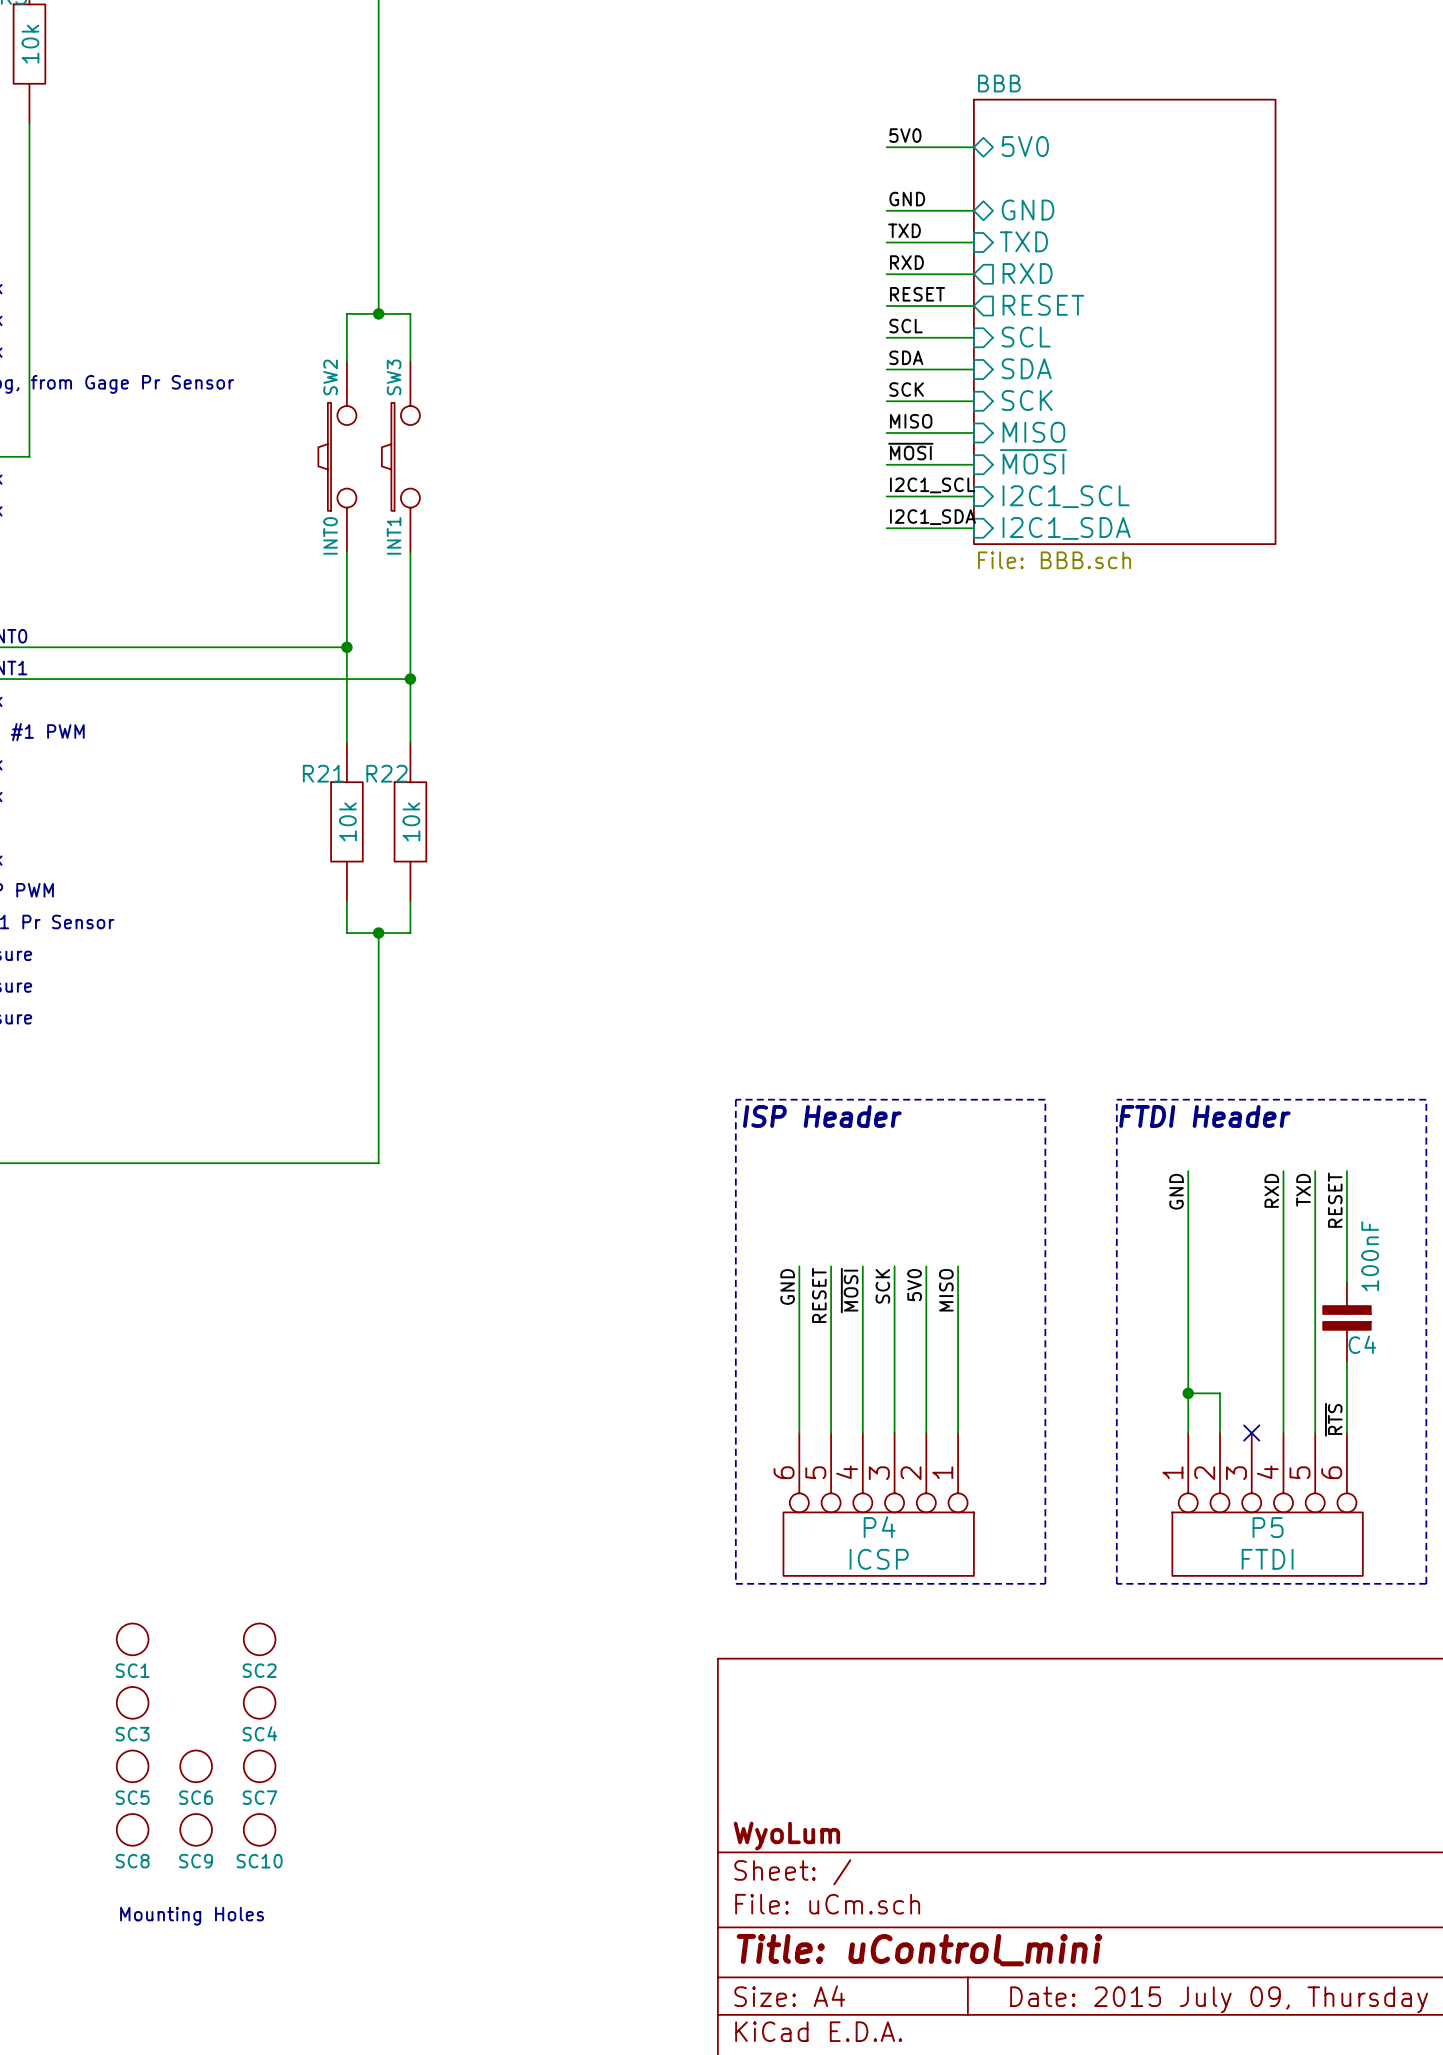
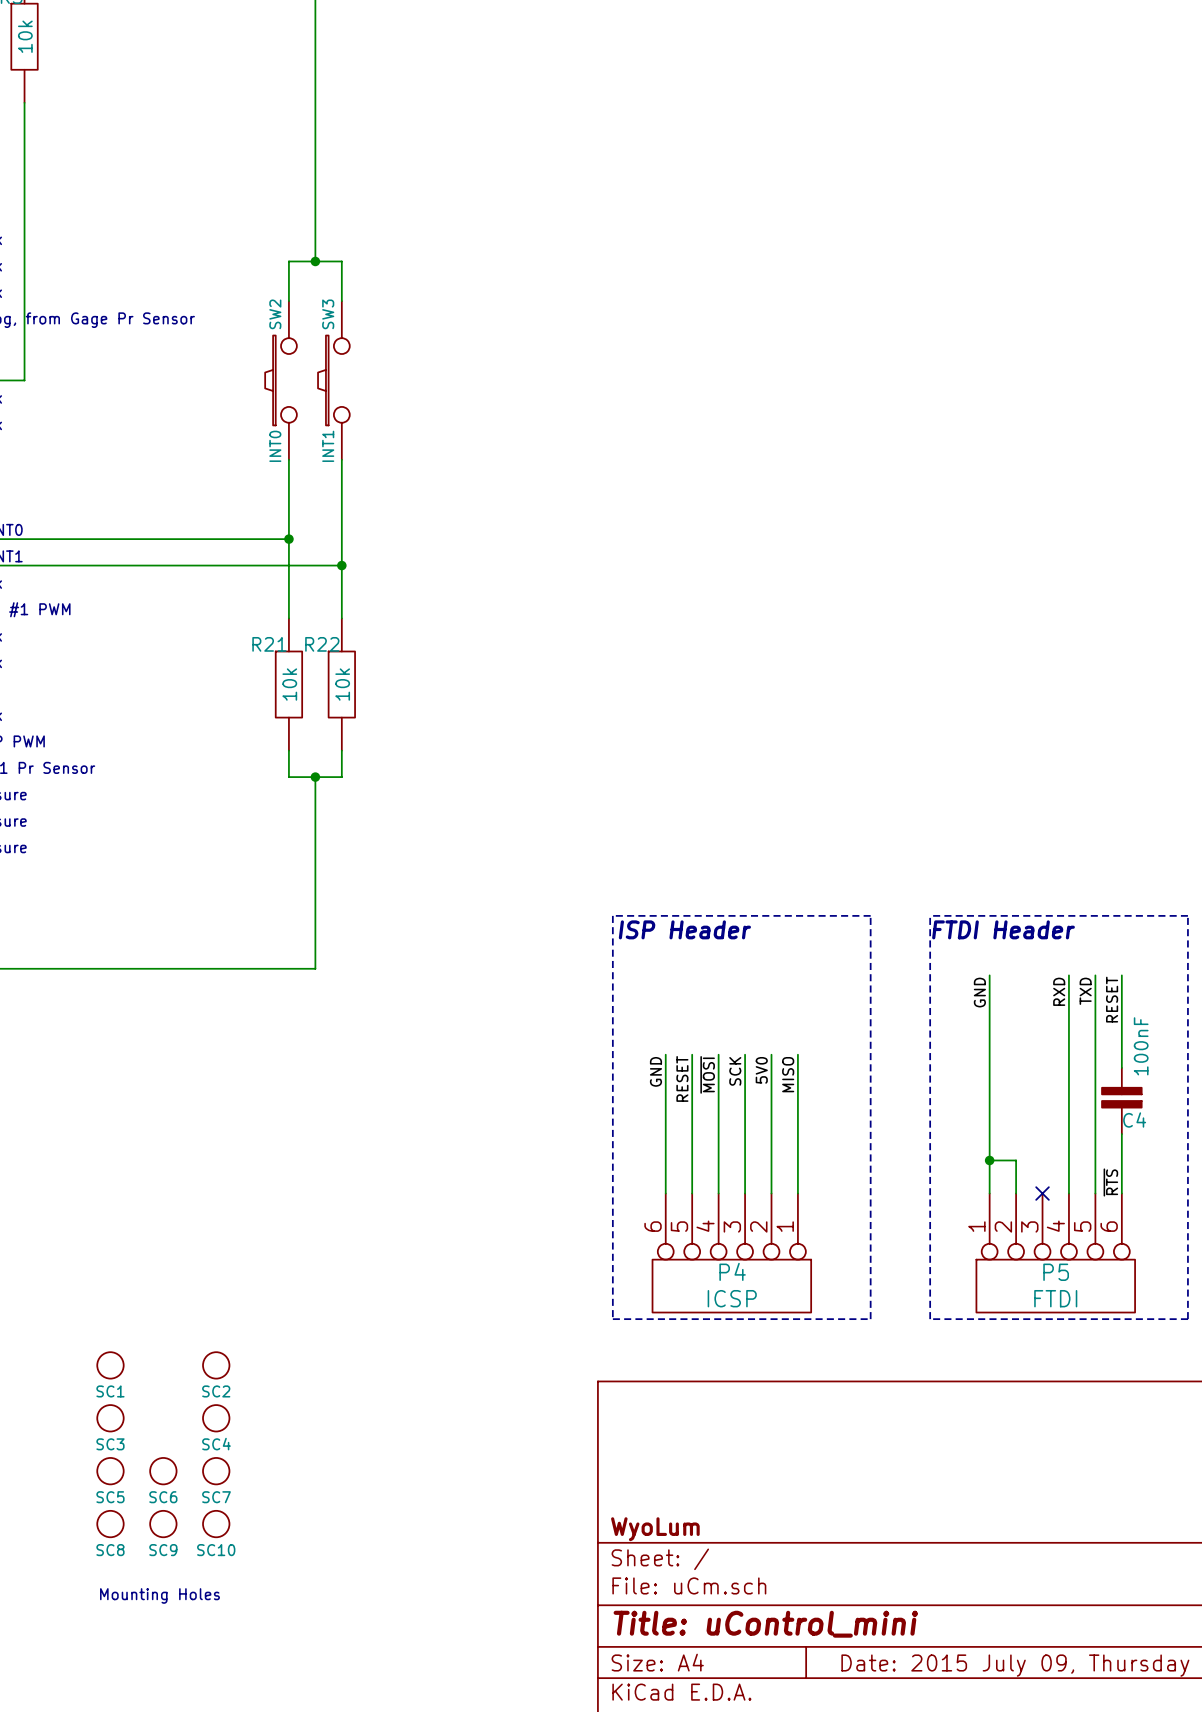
label: 5V0 (905, 135) -> none
sheet pin: 5V0 (1025, 146) -> none
wire: (886, 147) (973, 147) -> none
label: GND (907, 199) -> none
wire: (886, 210) (973, 210) -> none
sheet pin: GND (1028, 210) -> none
label: TXD (904, 230) -> none
sheet pin: TXD (1023, 241) -> none
wire: (886, 242) (973, 242) -> none
label: RXD (906, 262) -> none
sheet pin: RXD (1027, 273) -> none
wire: (886, 274) (973, 274) -> none
label: RESET (917, 294) -> none
sheet pin: RESET (1043, 305) -> none
wire: (886, 306) (973, 306) -> none
sheet BBB: File: BBB.sch (1124, 321) -> none
label: SCL (906, 326) -> none
wire: (886, 337) (973, 337) -> none
sheet pin: SCL (1026, 337) -> none
label: SDA (906, 357) -> none
sheet pin: SDA (1026, 368) -> none
wire: (886, 369) (973, 369) -> none
label: SCK (906, 389) -> none
sheet pin: SCK (1027, 400) -> none
wire: (886, 401) (973, 401) -> none
label: MISO (911, 421) -> none
sheet pin: MISO (1033, 432) -> none
wire: (886, 433) (973, 433) -> none
label: ~{MOSI} (910, 451) -> none
sheet pin: ~{MOSI} (1033, 461) -> none
wire: (886, 464) (973, 464) -> none
label: I2C1_SCL (932, 485) -> none
wire: (886, 496) (973, 496) -> none
sheet pin: I2C1_SCL (1066, 496) -> none
label: I2C1_SDA (932, 517) -> none
wire: (886, 528) (973, 528) -> none
sheet pin: I2C1_SDA (1066, 528) -> none

